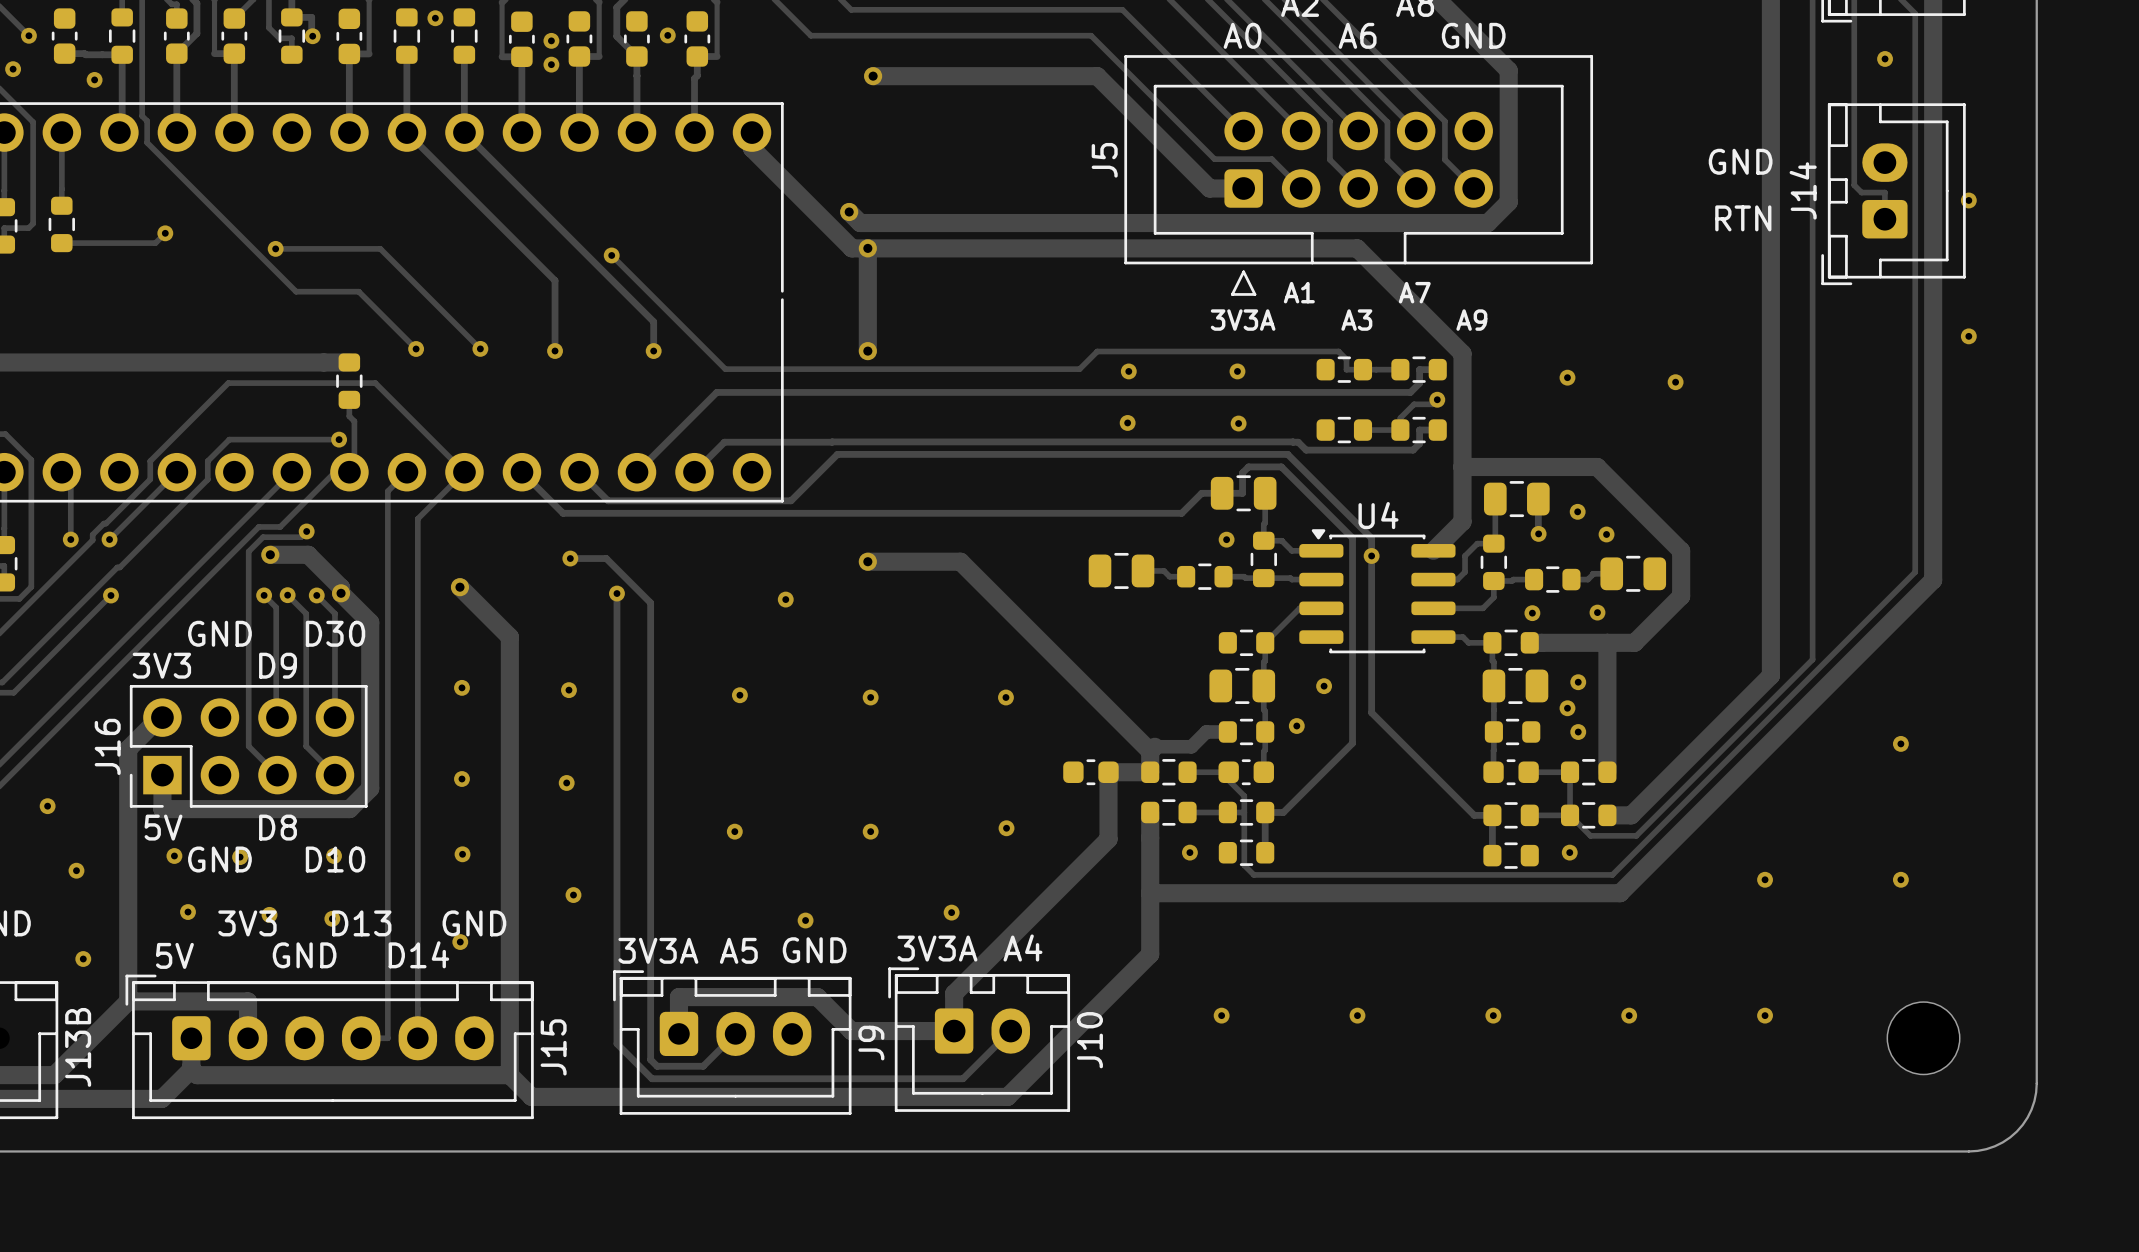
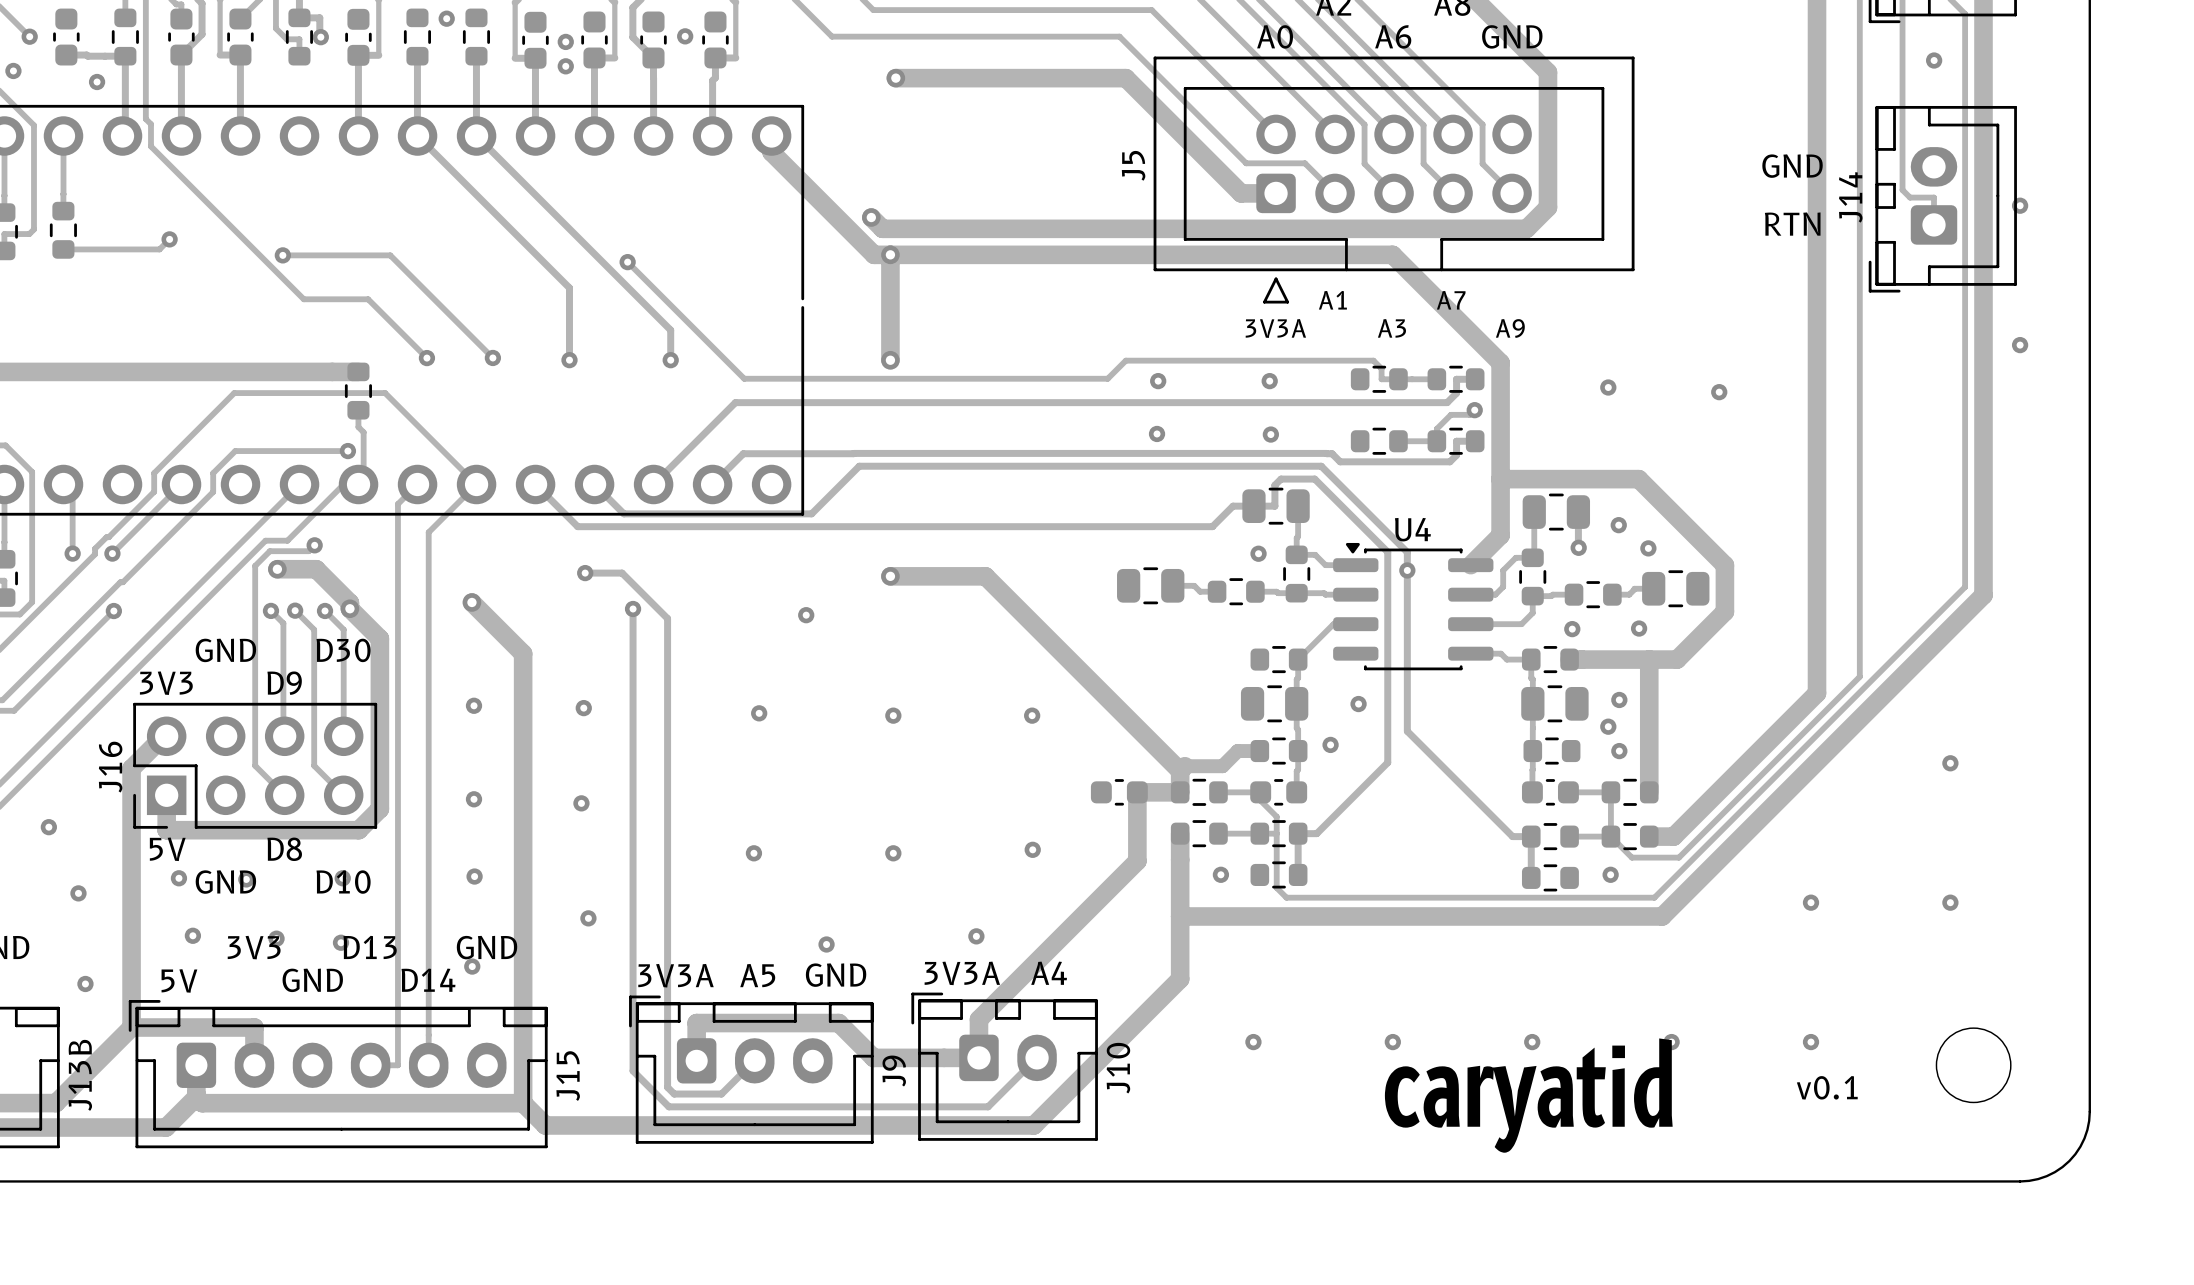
text: none -> v0.1 (1827, 1087)
text: none -> caryatid (1528, 1095)

